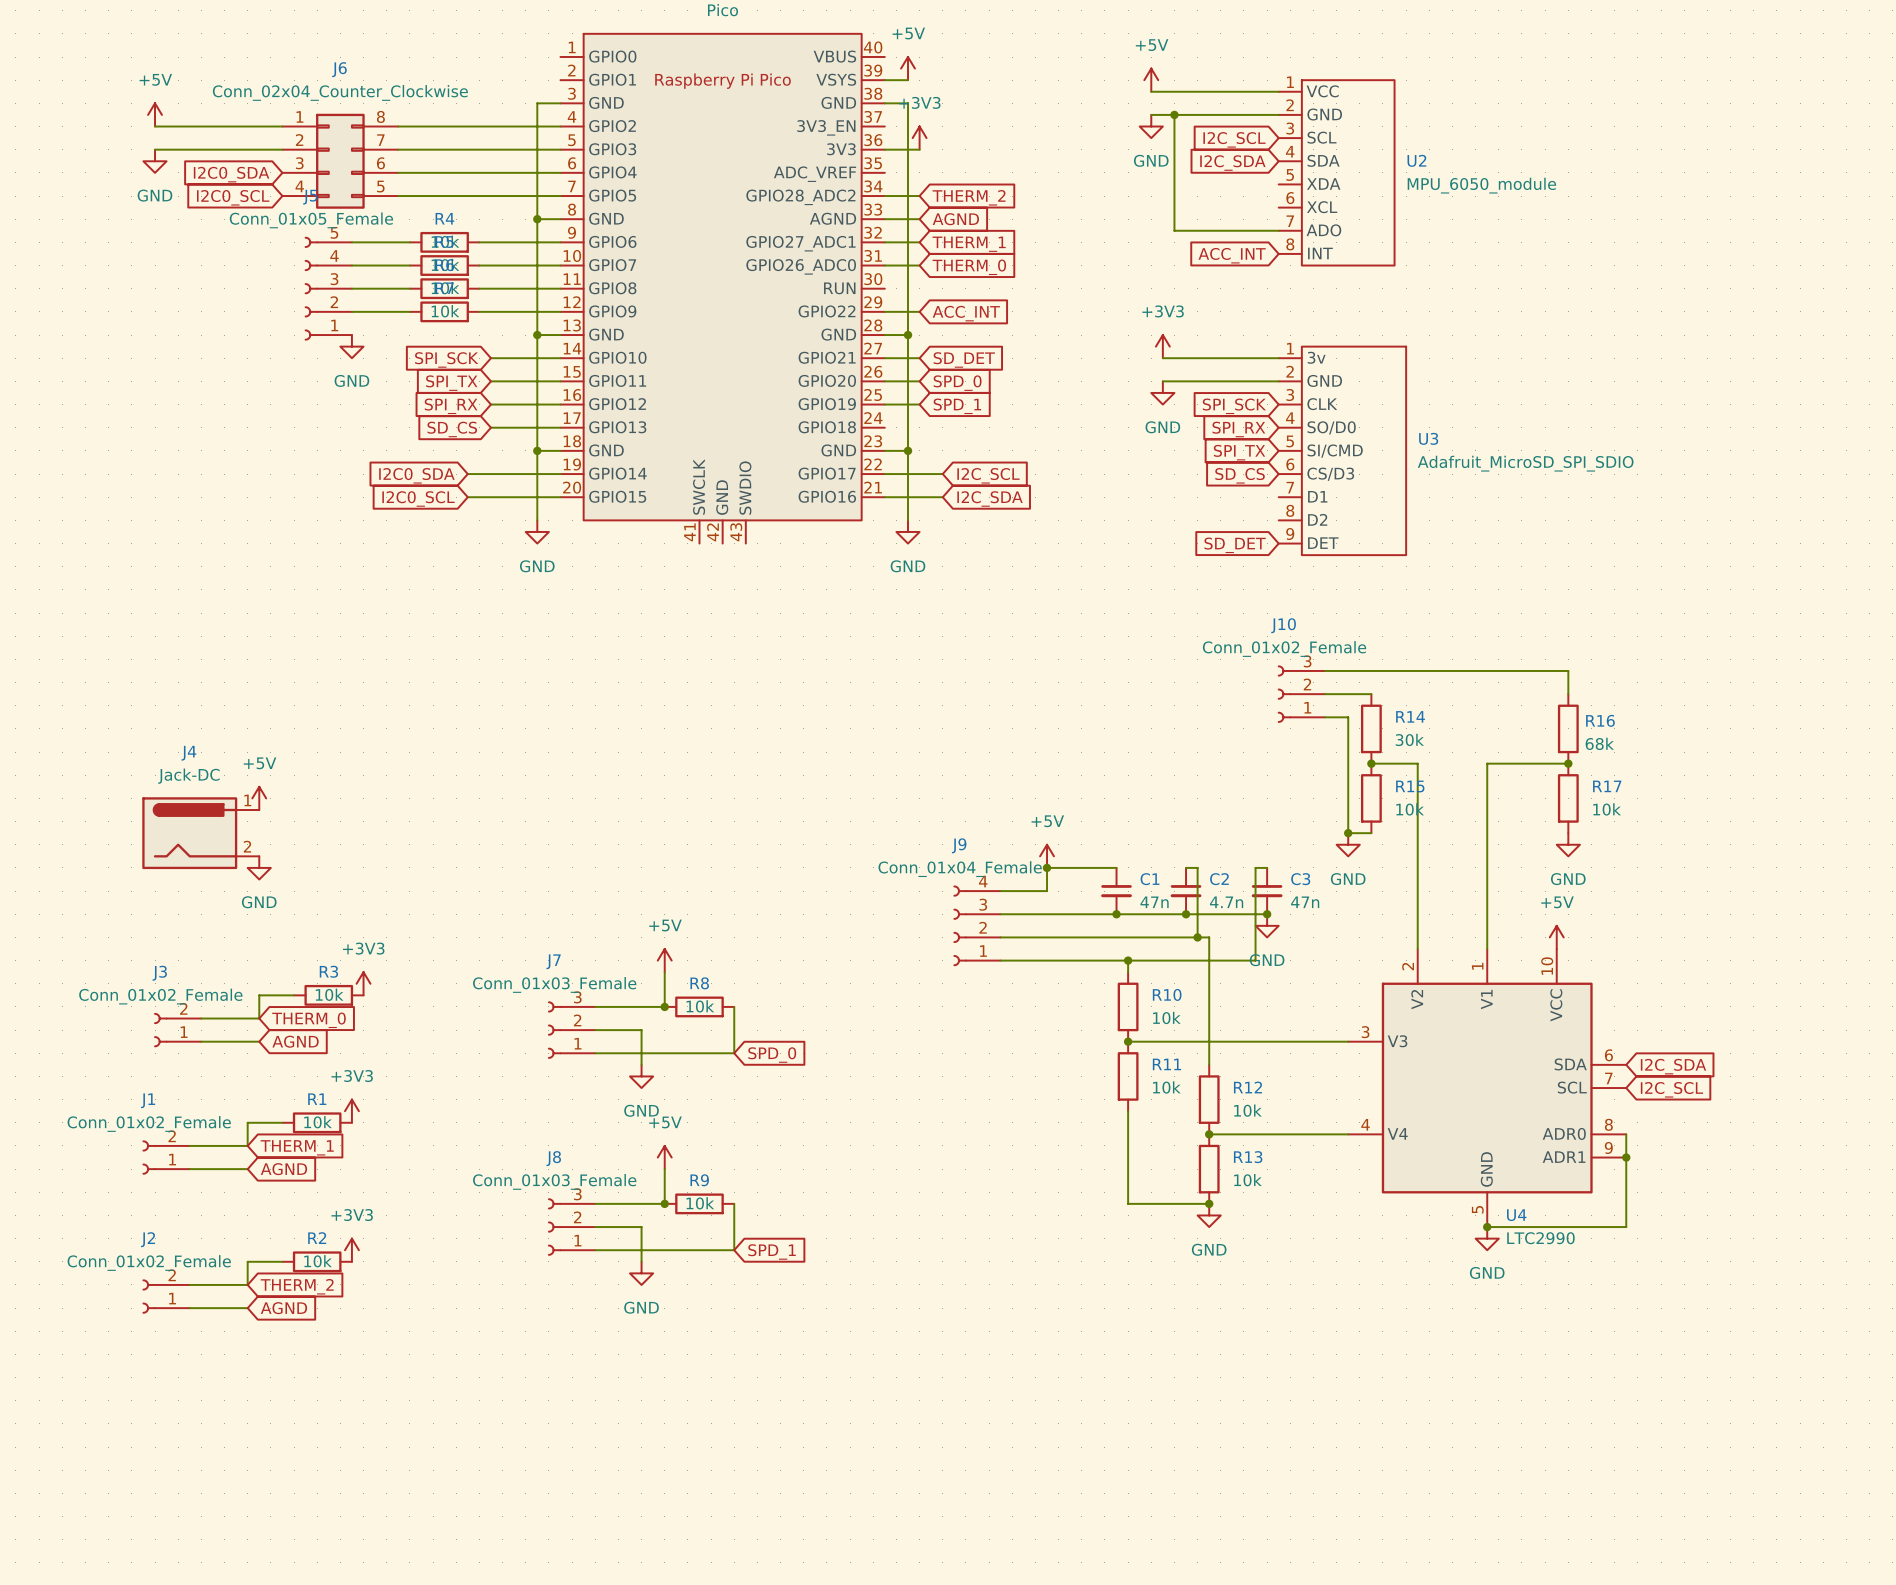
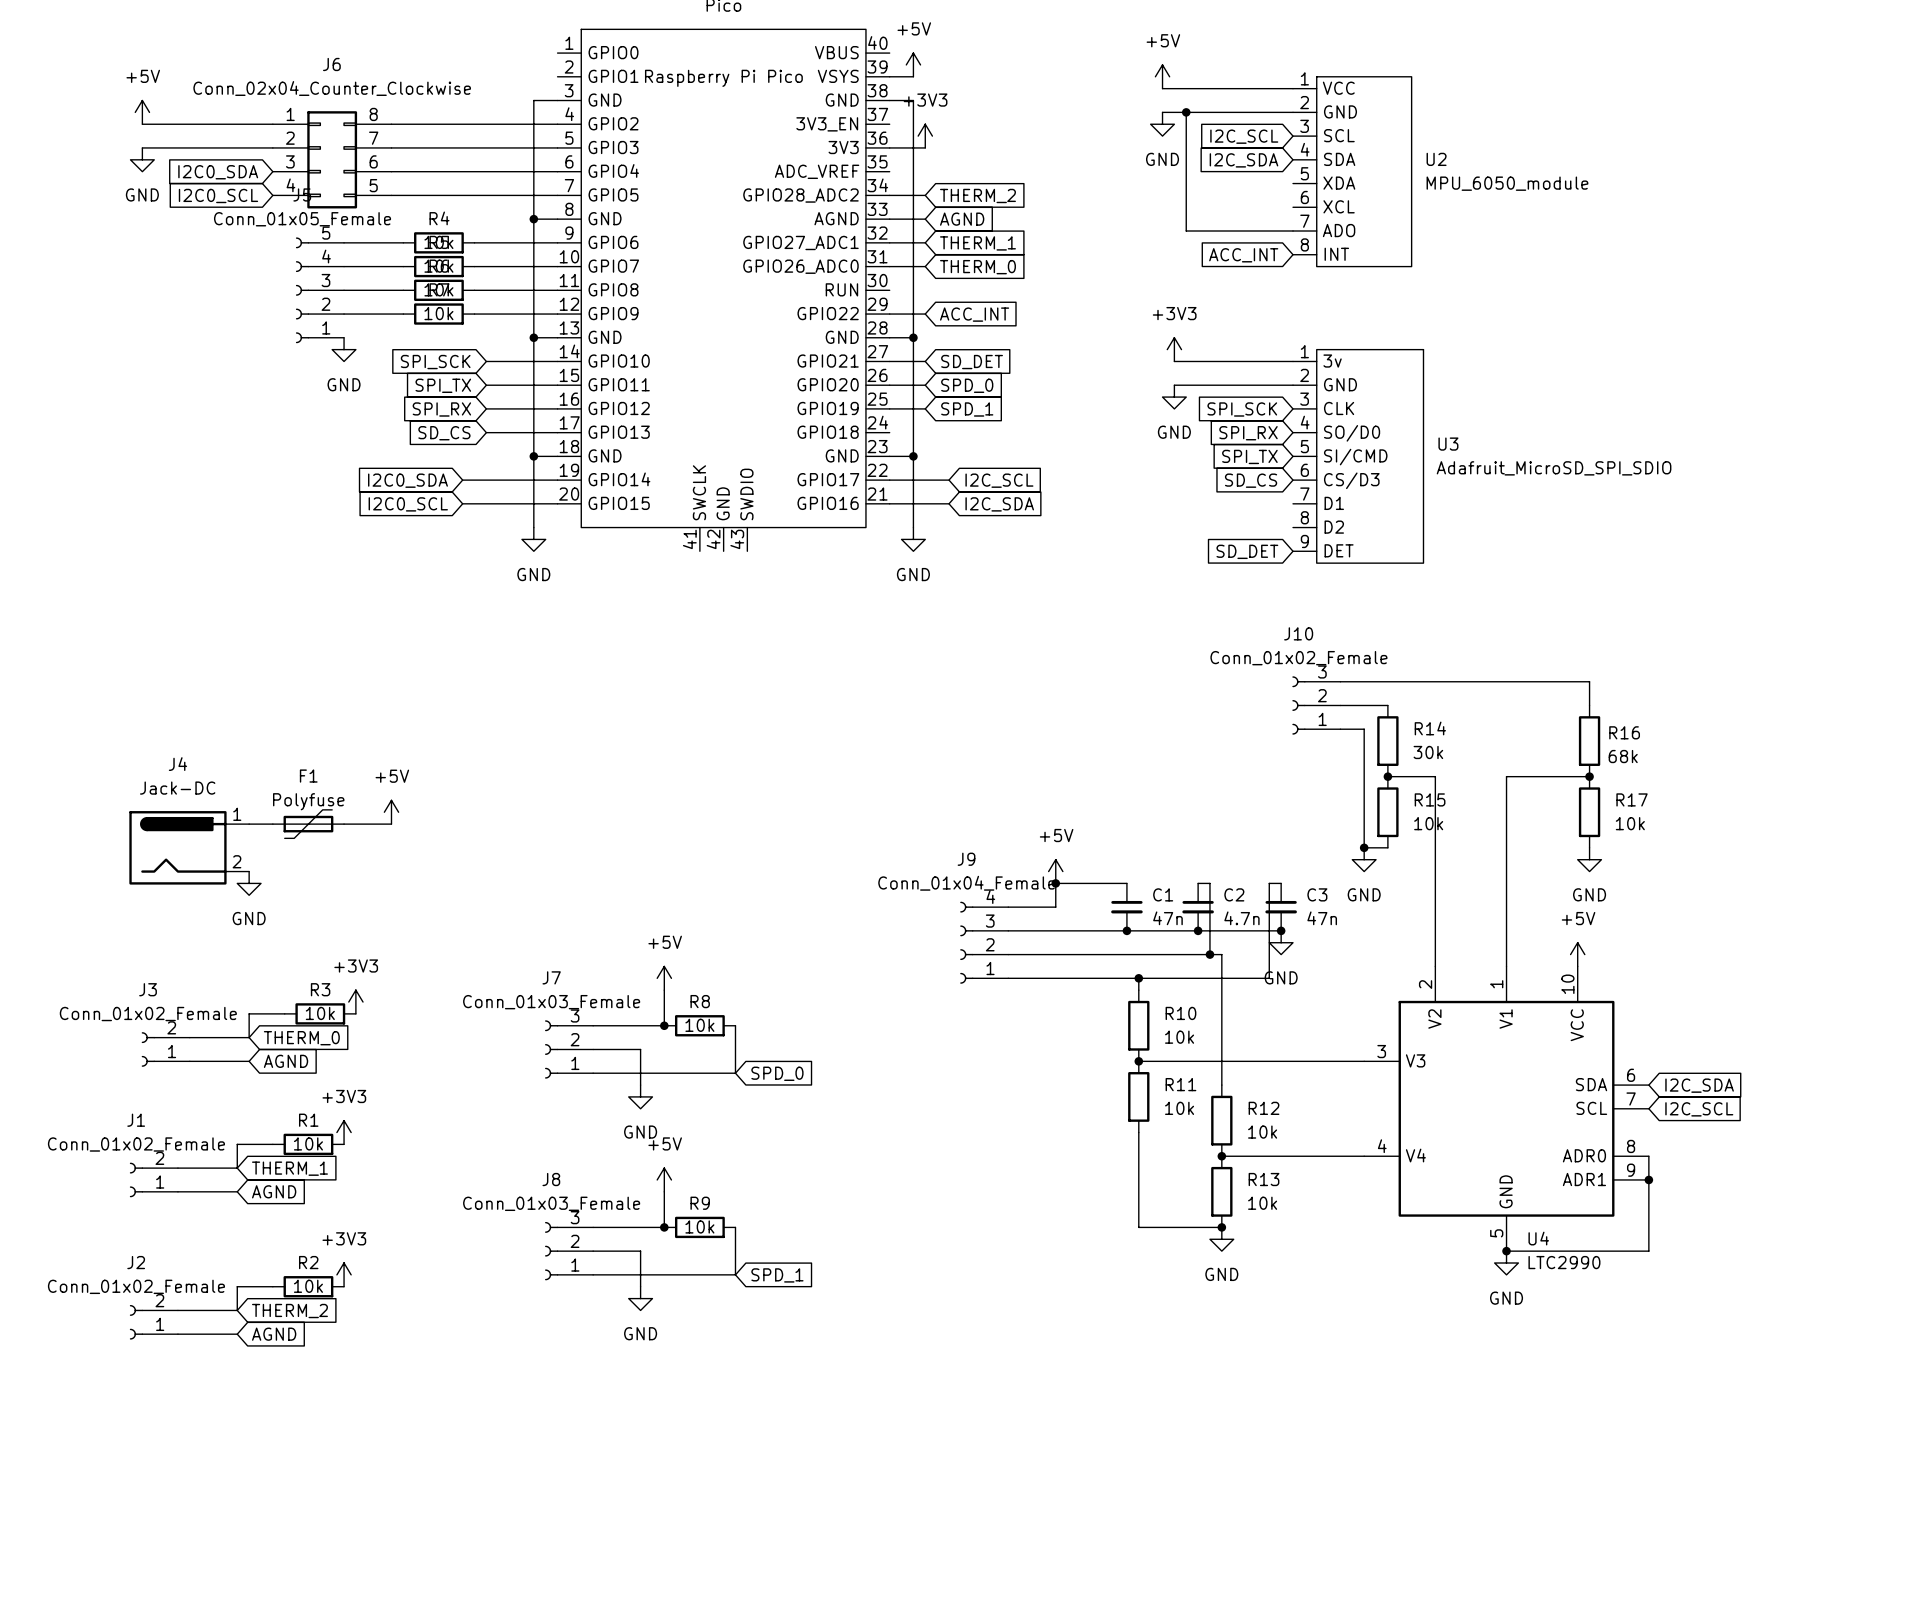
power symbol position: +5V (259, 798) -> +5V (391, 812)
wire: none -> (249, 824) (272, 824)
F1: none -> Polyfuse (308, 824)
wire: none -> (344, 824) (391, 824)

